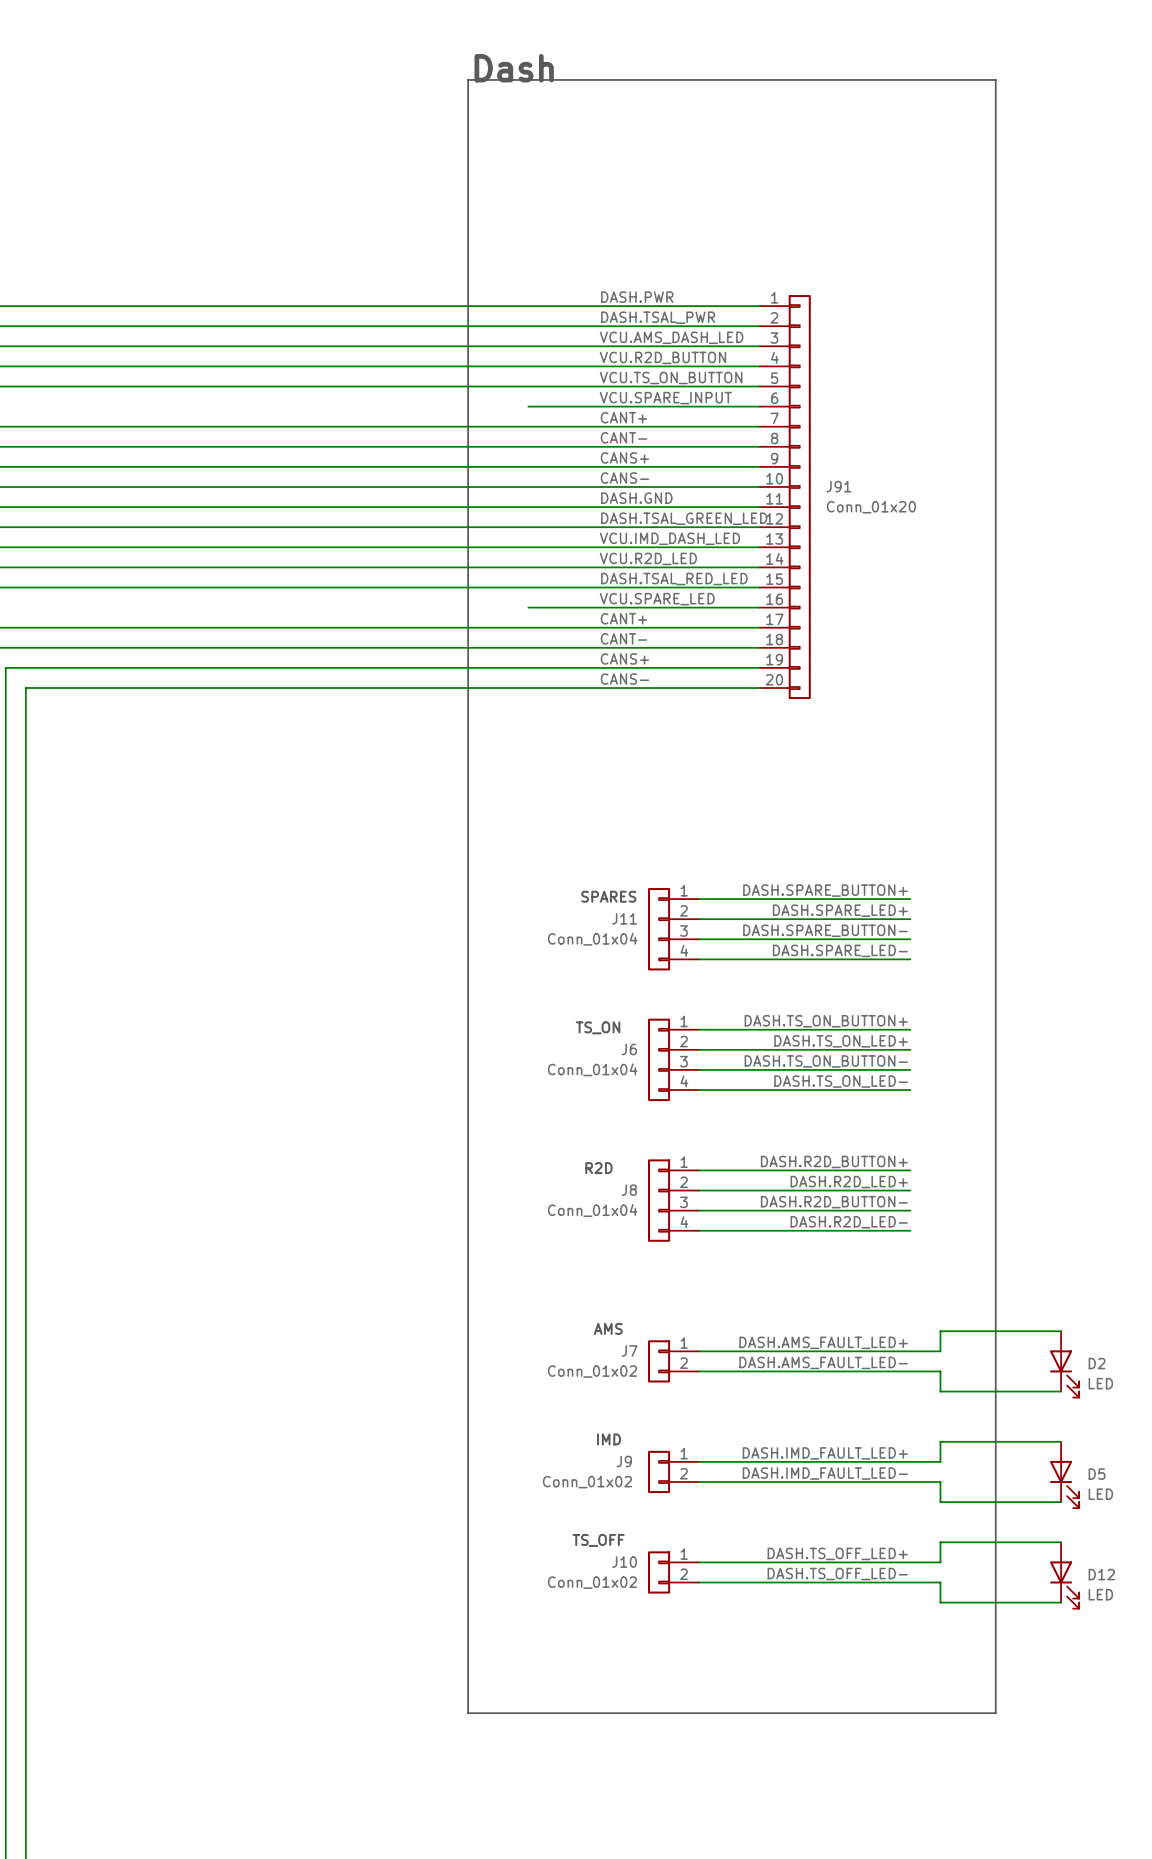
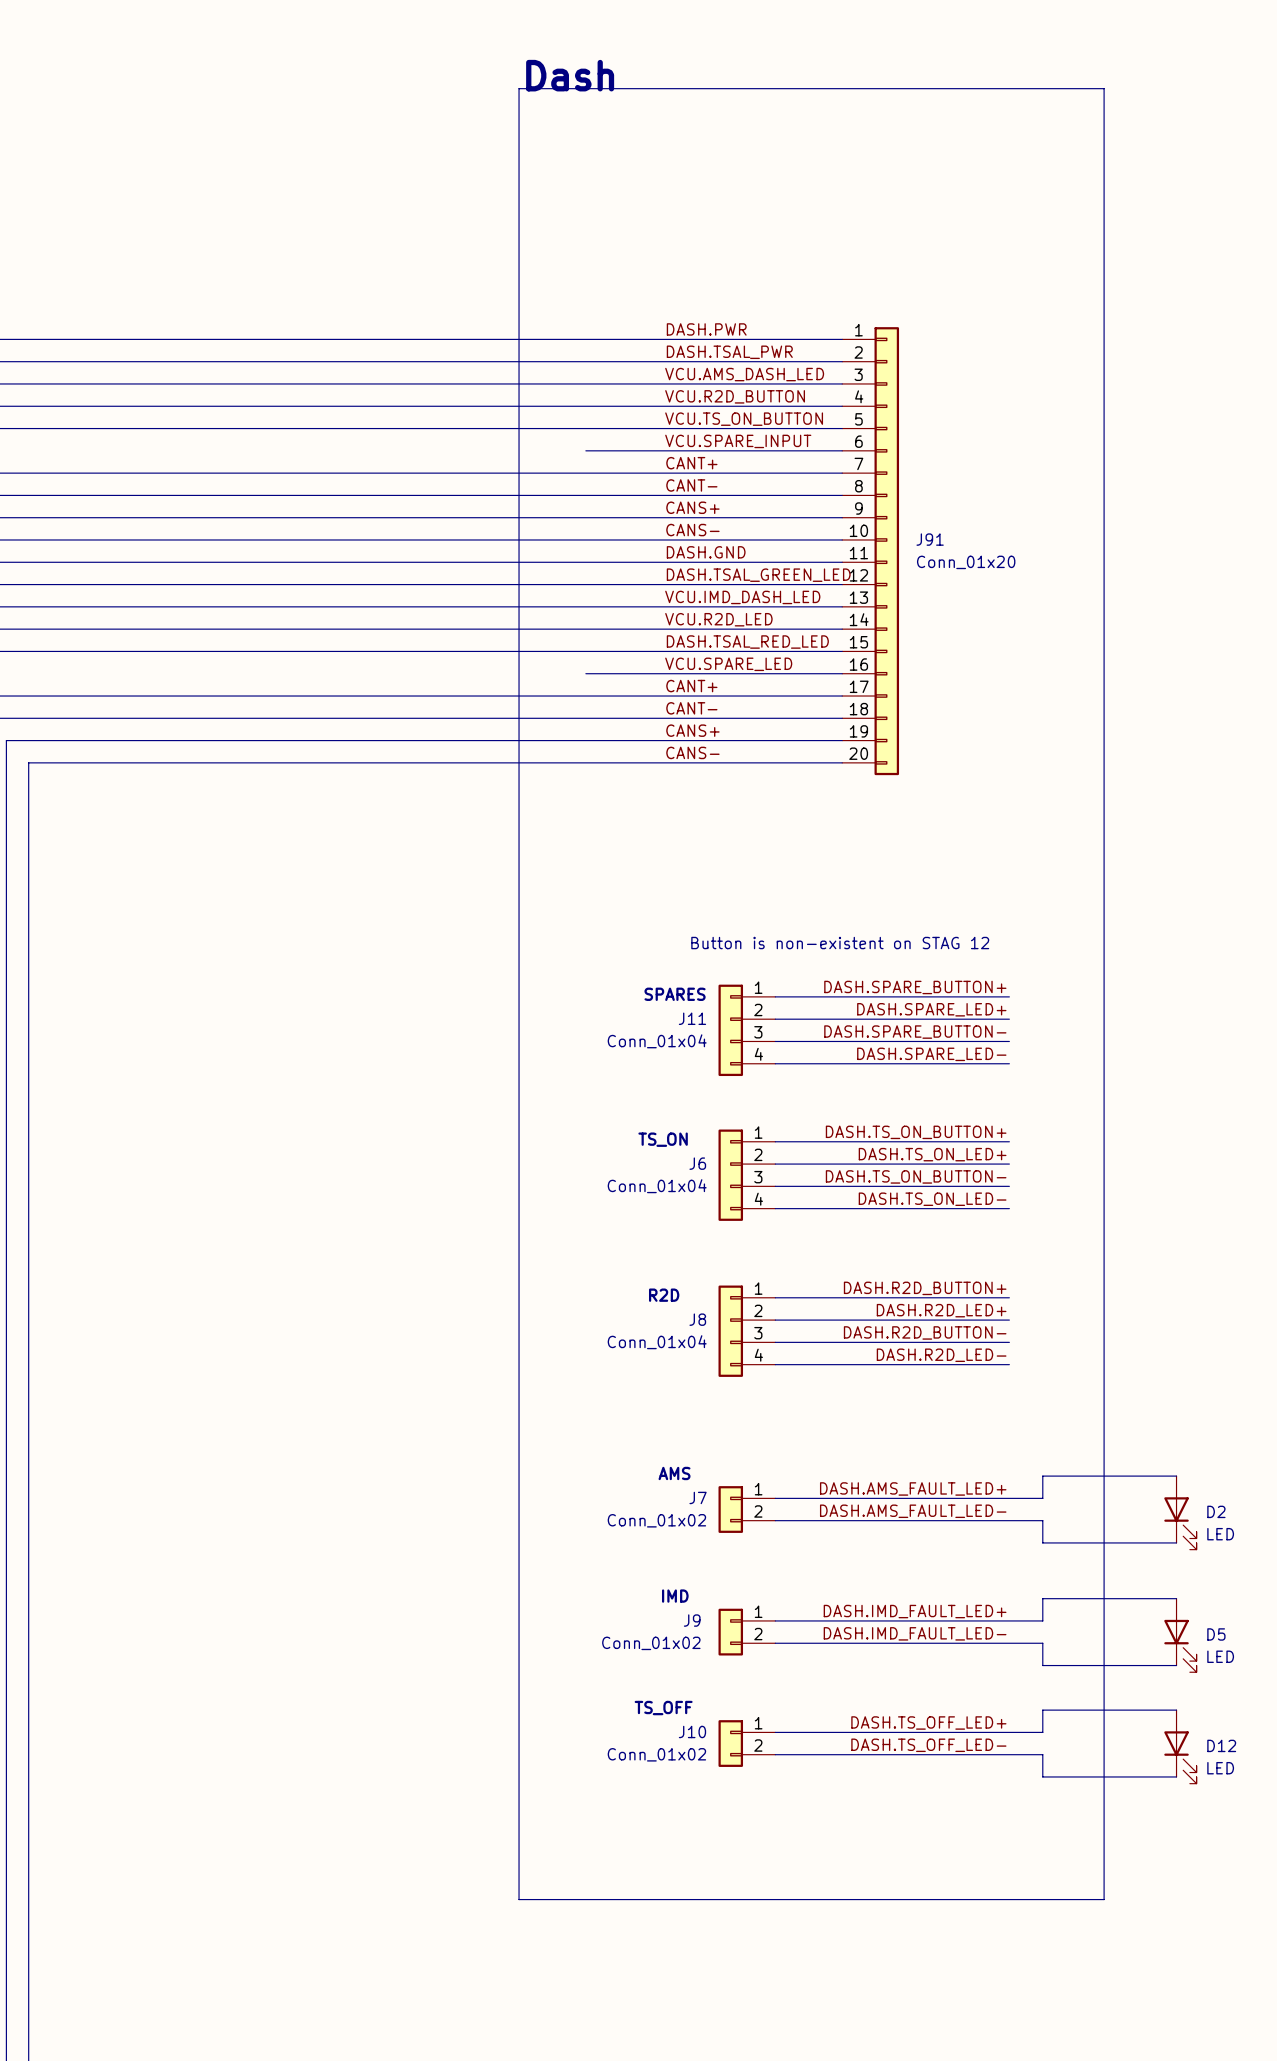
text: none -> Button is non-existent on STAG 12 (840, 943)

